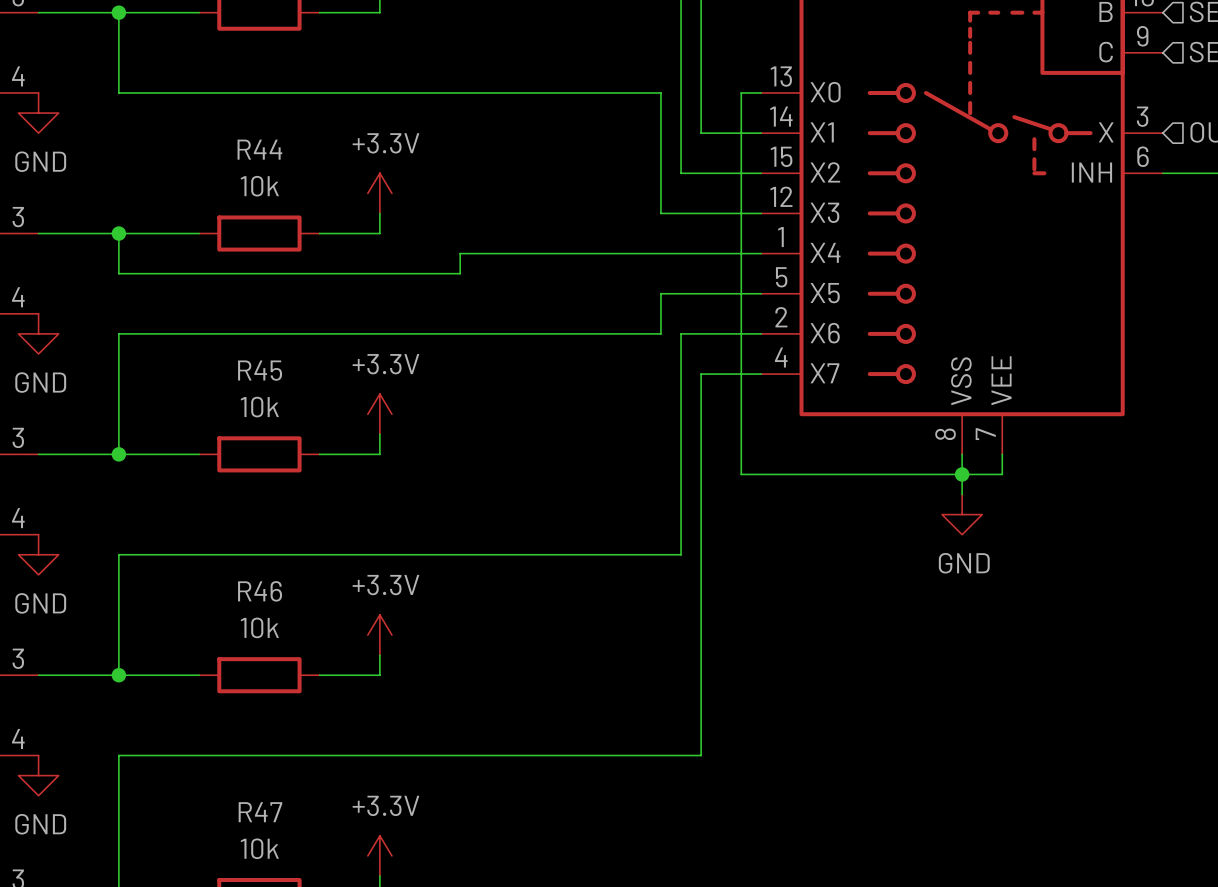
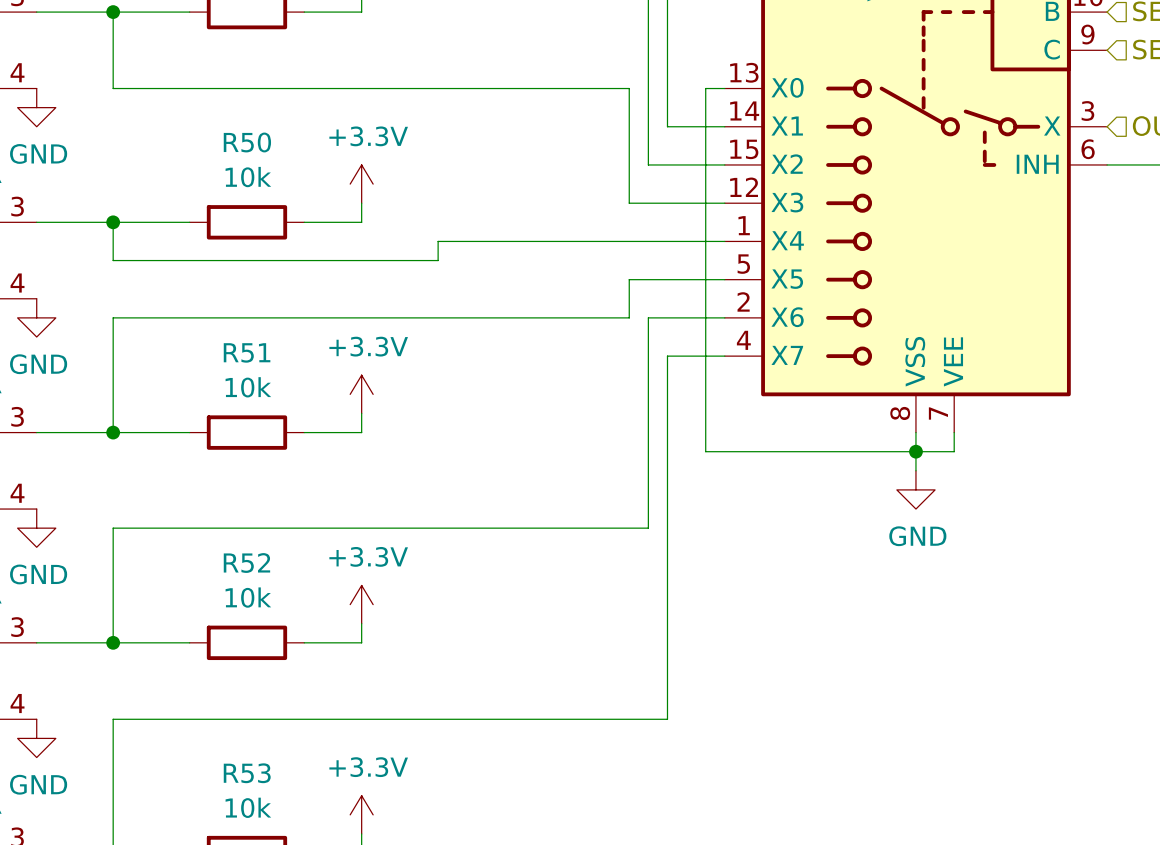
R44 name: R44 (259, 149) -> R50 (247, 142)
R45 name: R45 (260, 370) -> R51 (247, 352)
R46 name: R46 (260, 591) -> R52 (246, 563)
R47 name: R47 (260, 812) -> R53 (247, 773)

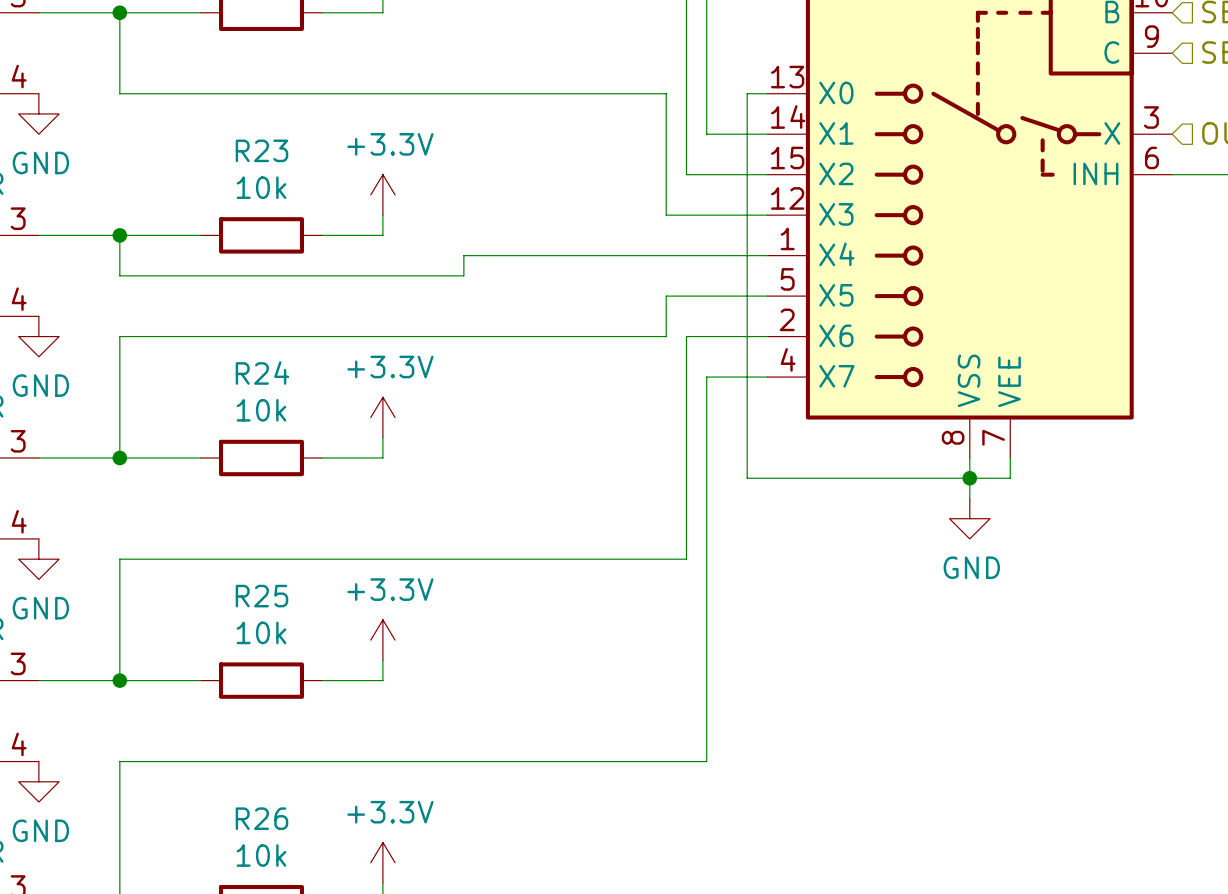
R50 name: R50 (247, 142) -> R23 (261, 150)
R51 name: R51 (247, 352) -> R24 (262, 372)
R52 name: R52 (246, 563) -> R25 (261, 596)
R53 name: R53 (247, 773) -> R26 (261, 818)

